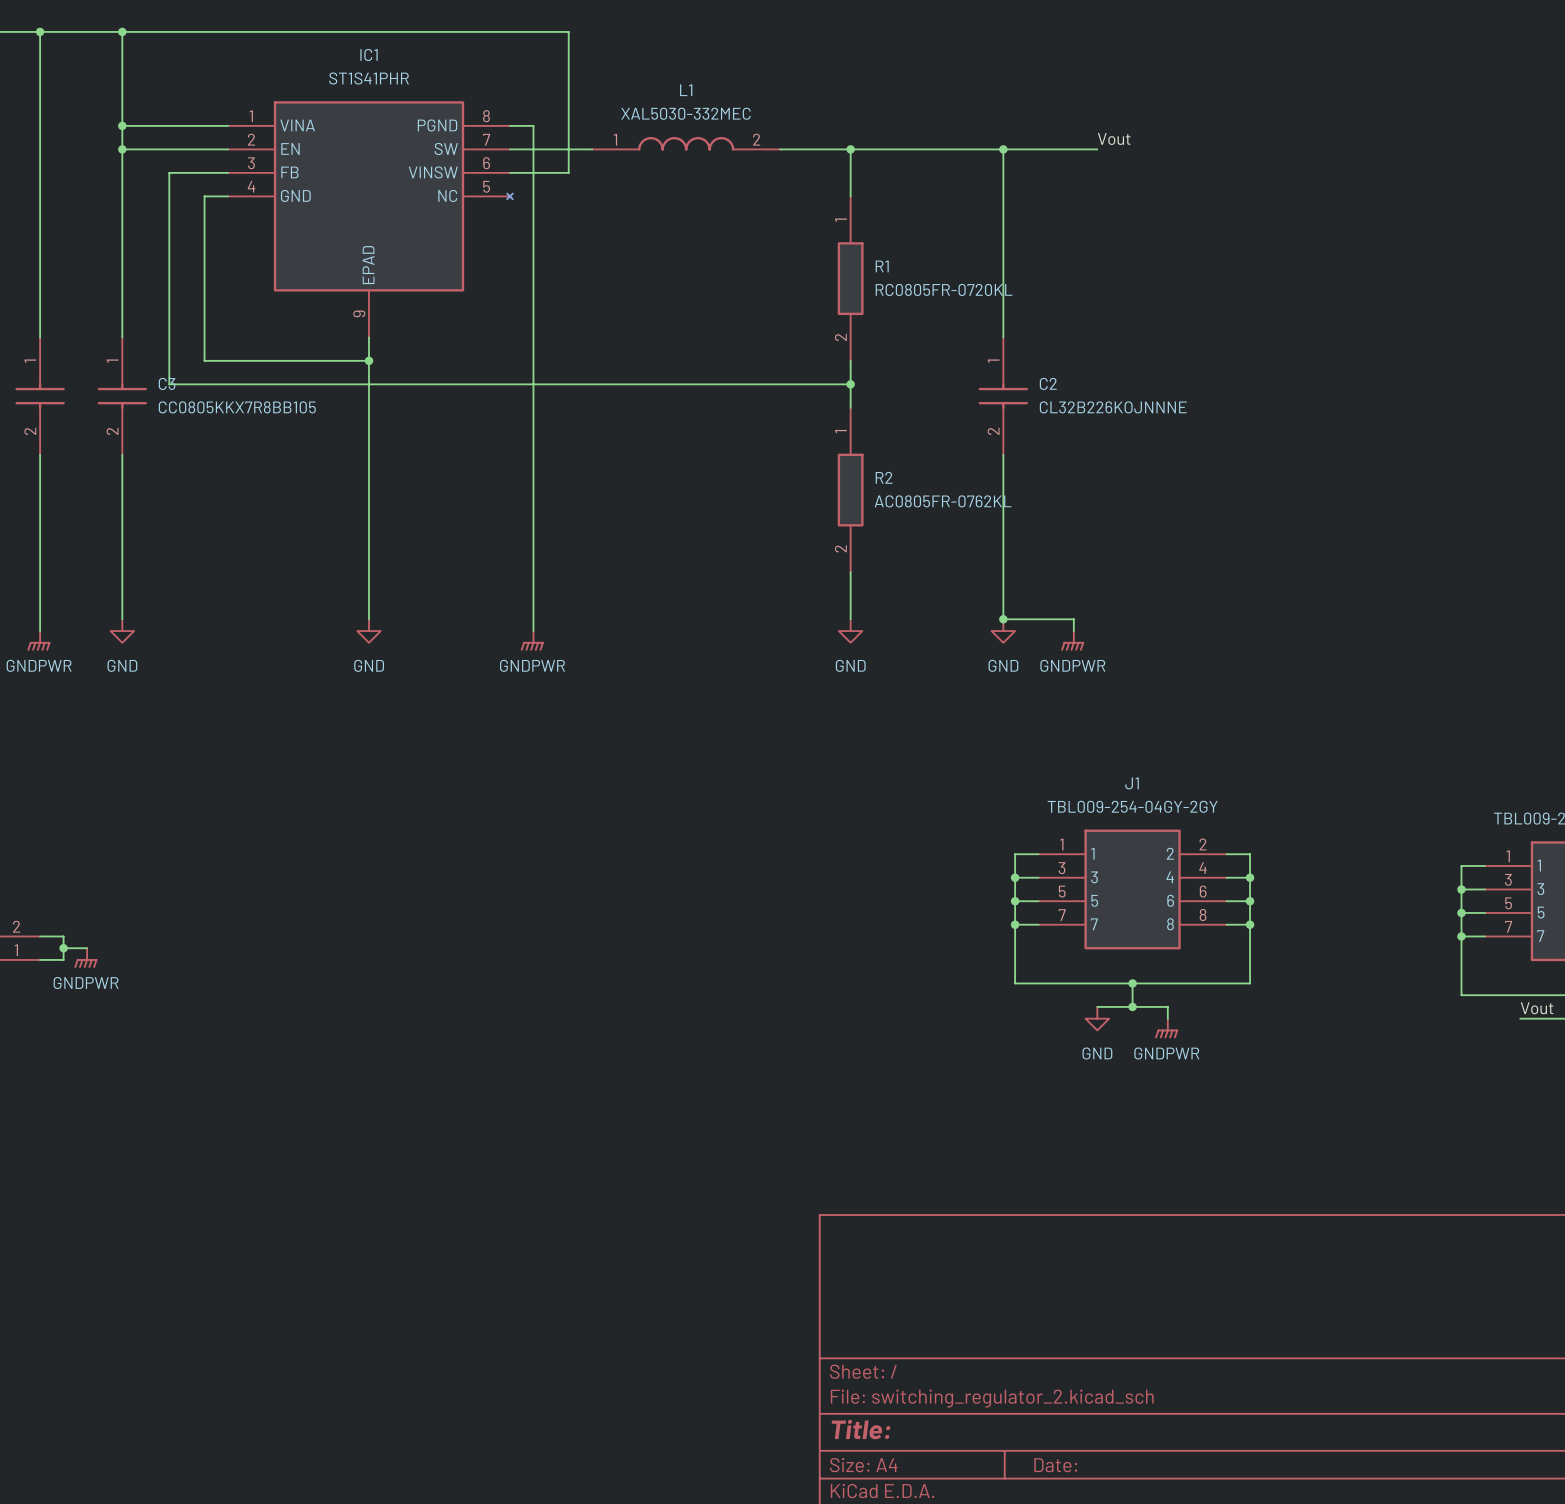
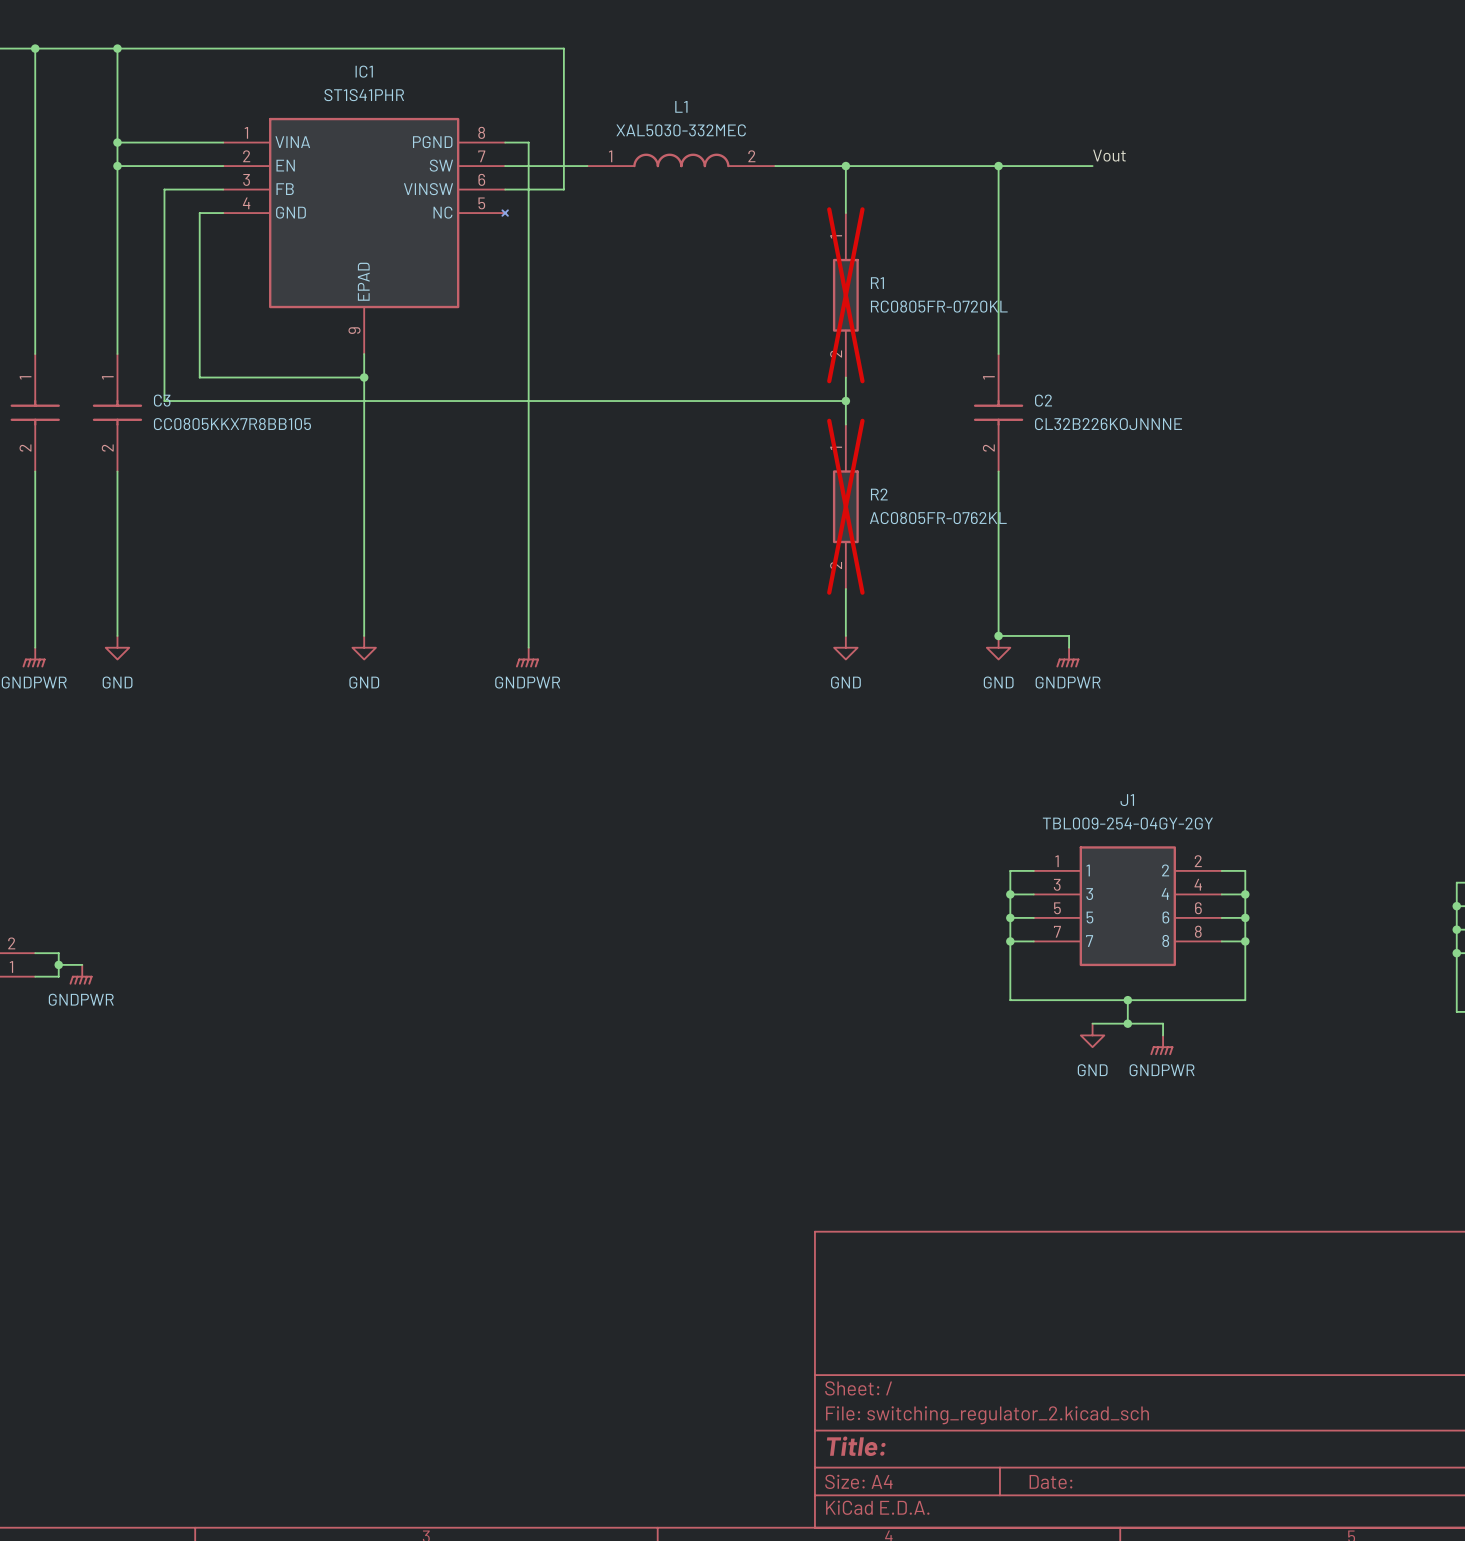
R1 do-not-place cross: none -> (845, 295)
R2 do-not-place cross: none -> (845, 506)

